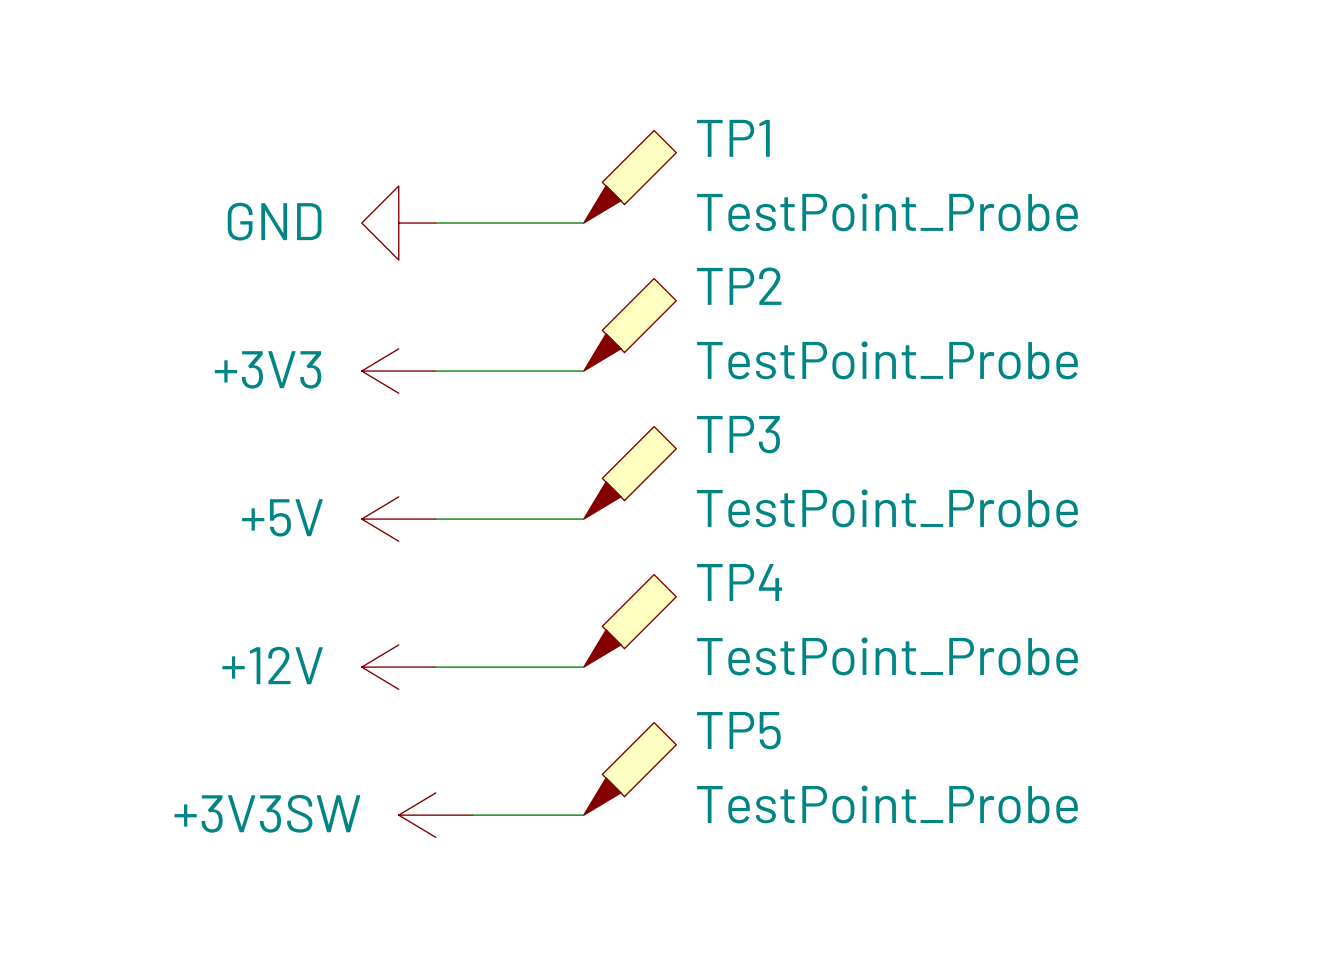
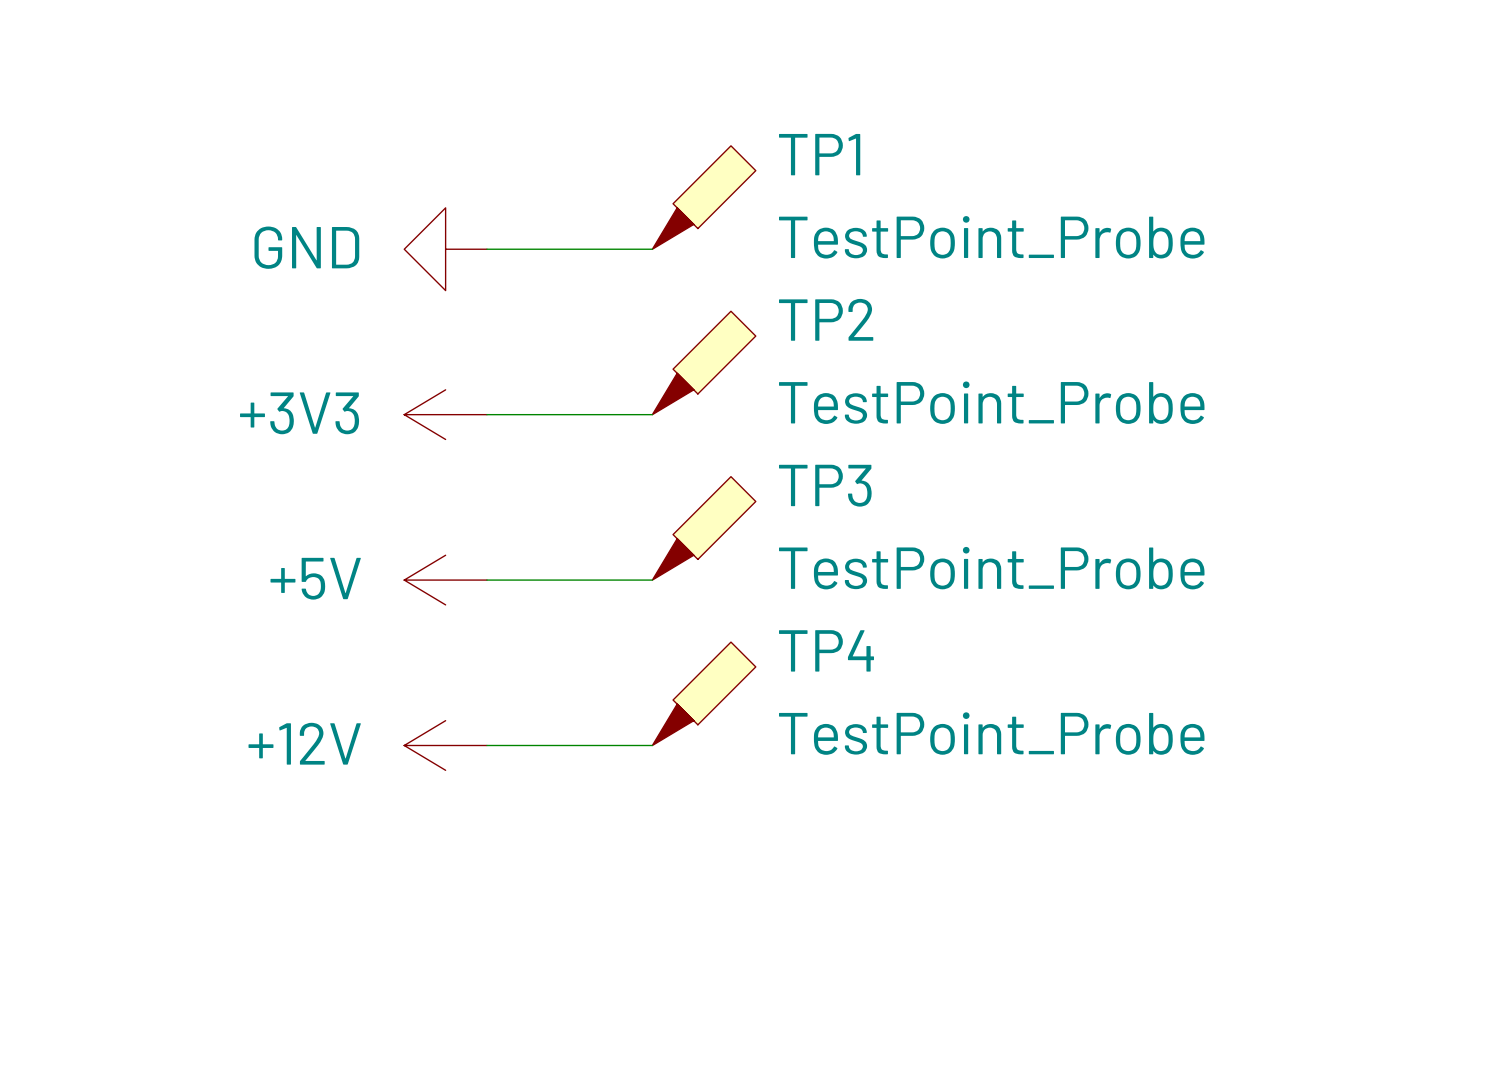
TP5: TestPoint_Probe (630, 768) -> none
power symbol: +3V3SW (435, 815) -> none
wire: (472, 815) (583, 815) -> none

